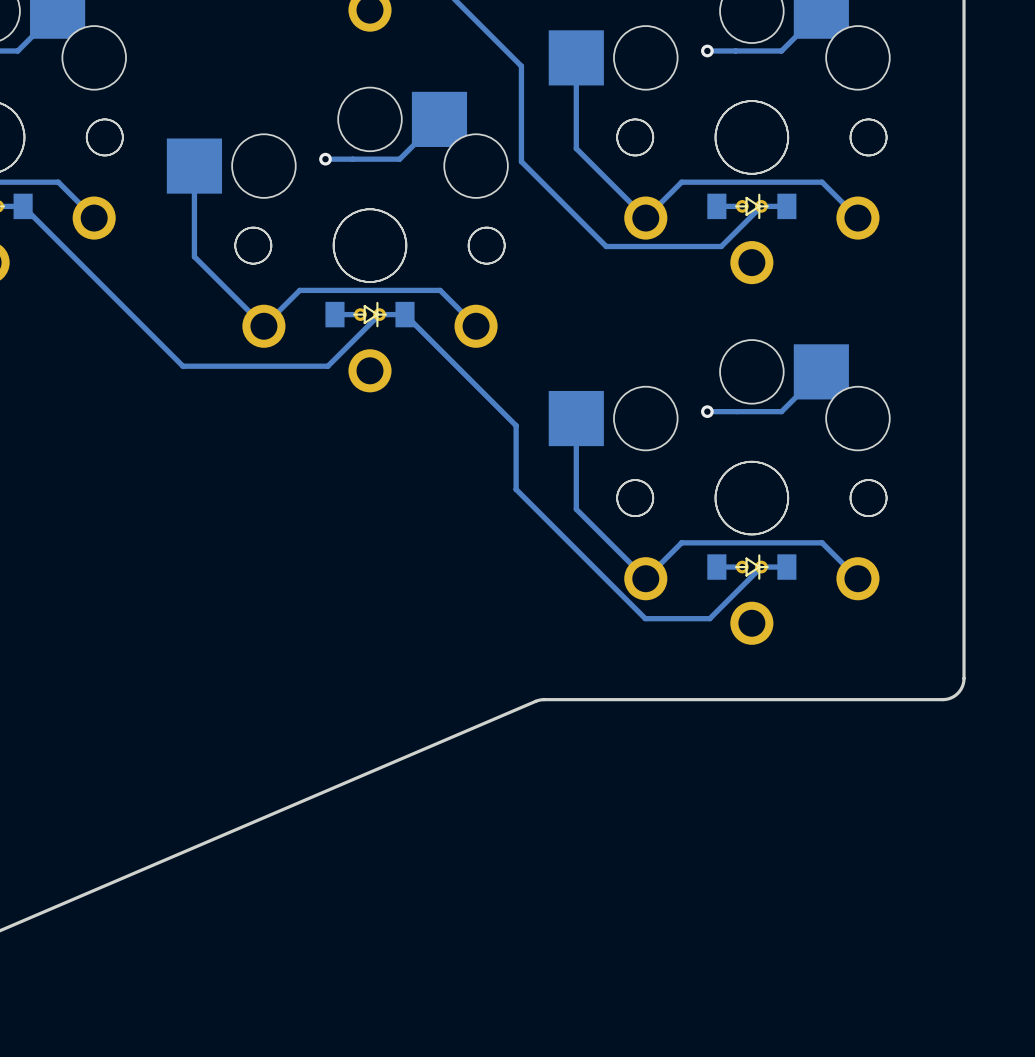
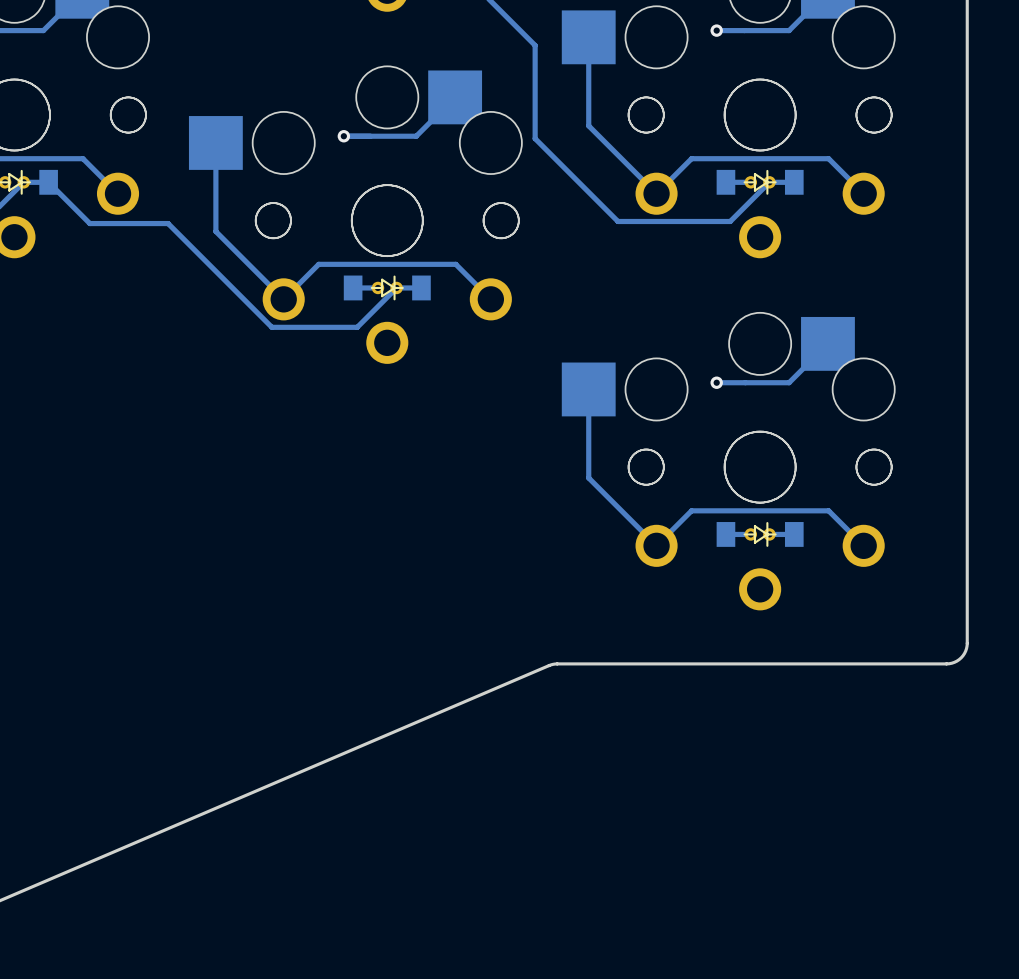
track: (65, 248) (182, 366) (327, 366) (339, 354) -> (89, 223) (168, 223) (271, 327) (357, 327)
track: (405, 314) (516, 425) (516, 489) (645, 618) (709, 618) (761, 567) -> none

